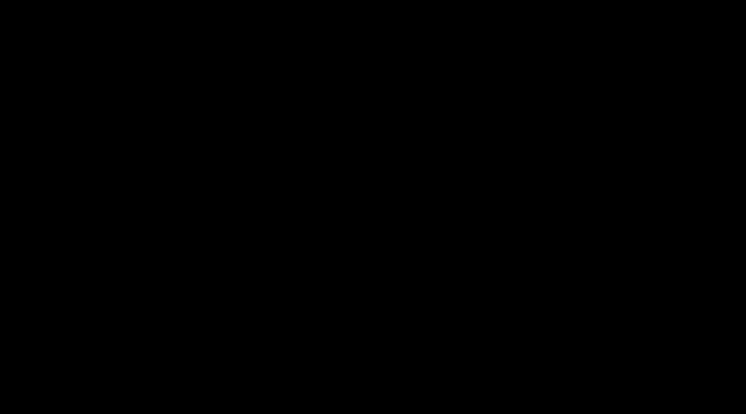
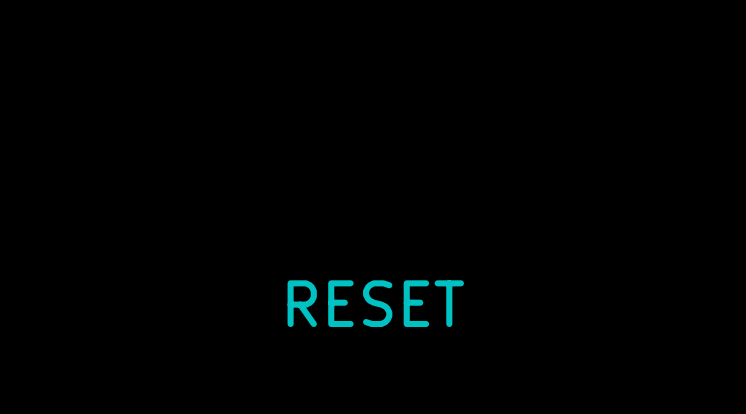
text: none -> RESET (375, 303)

